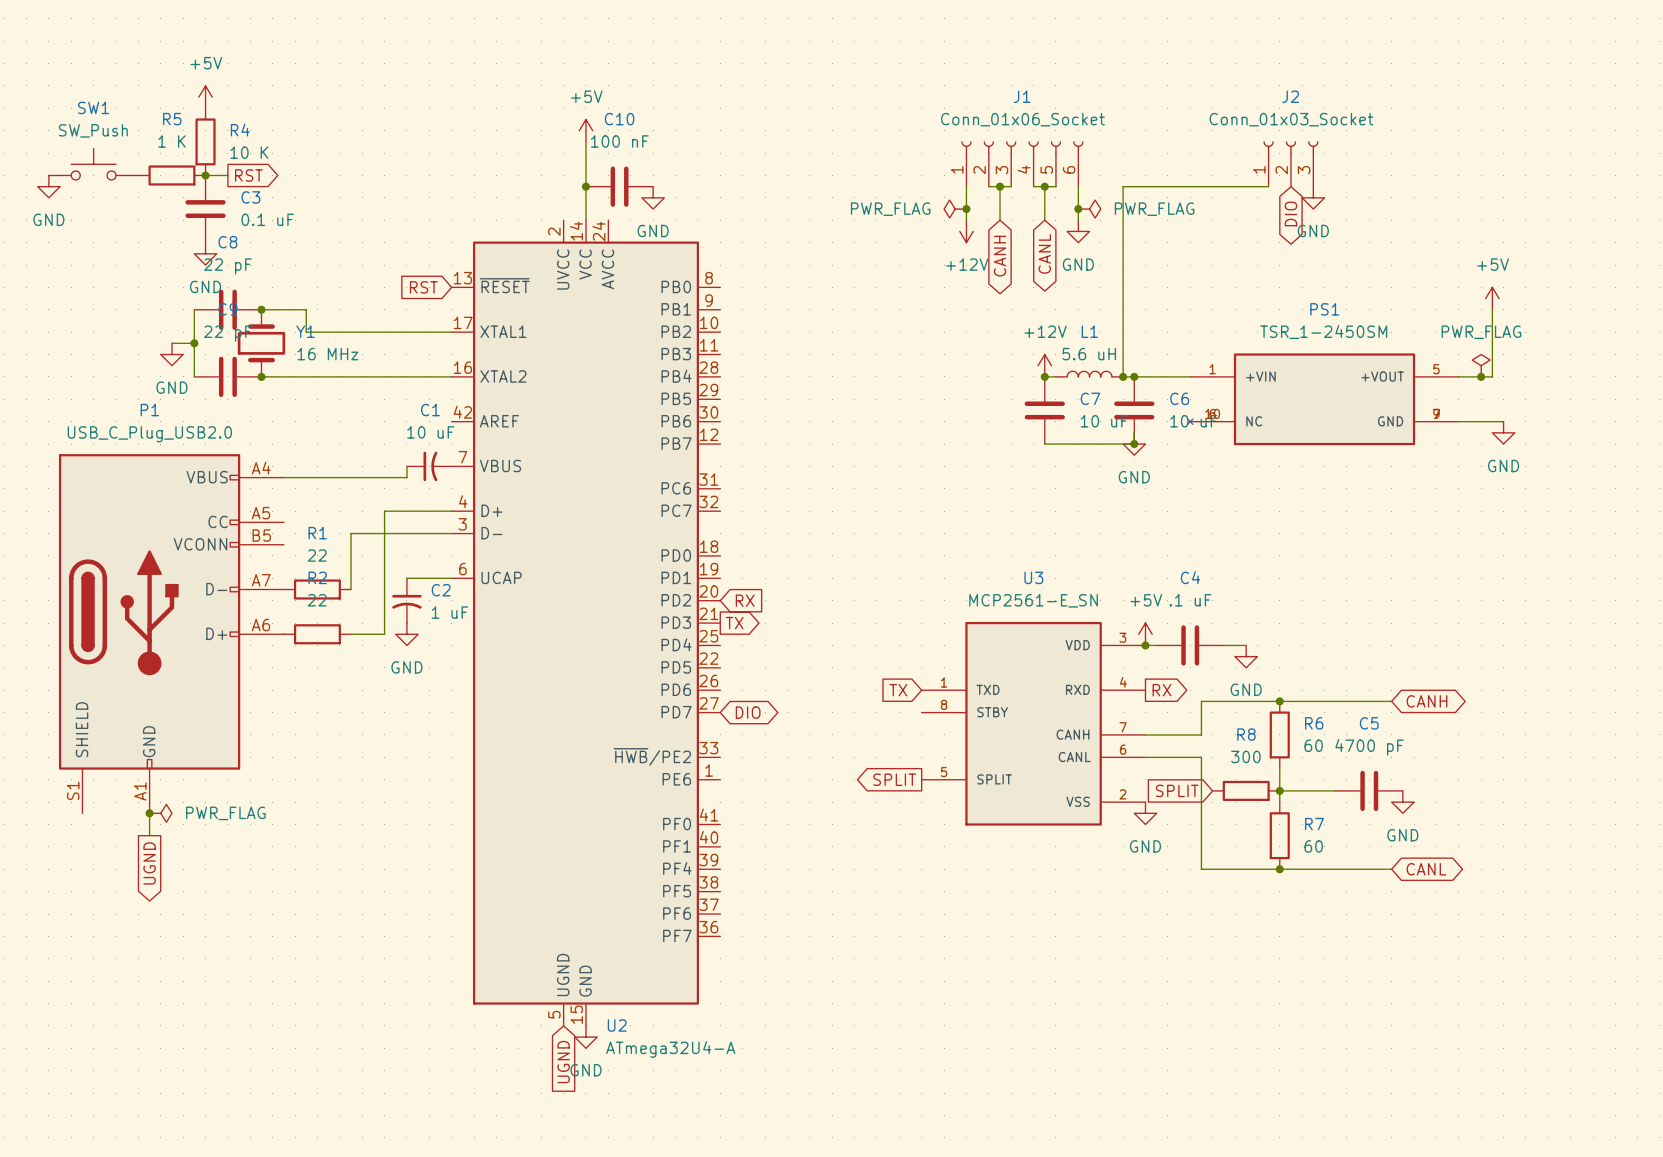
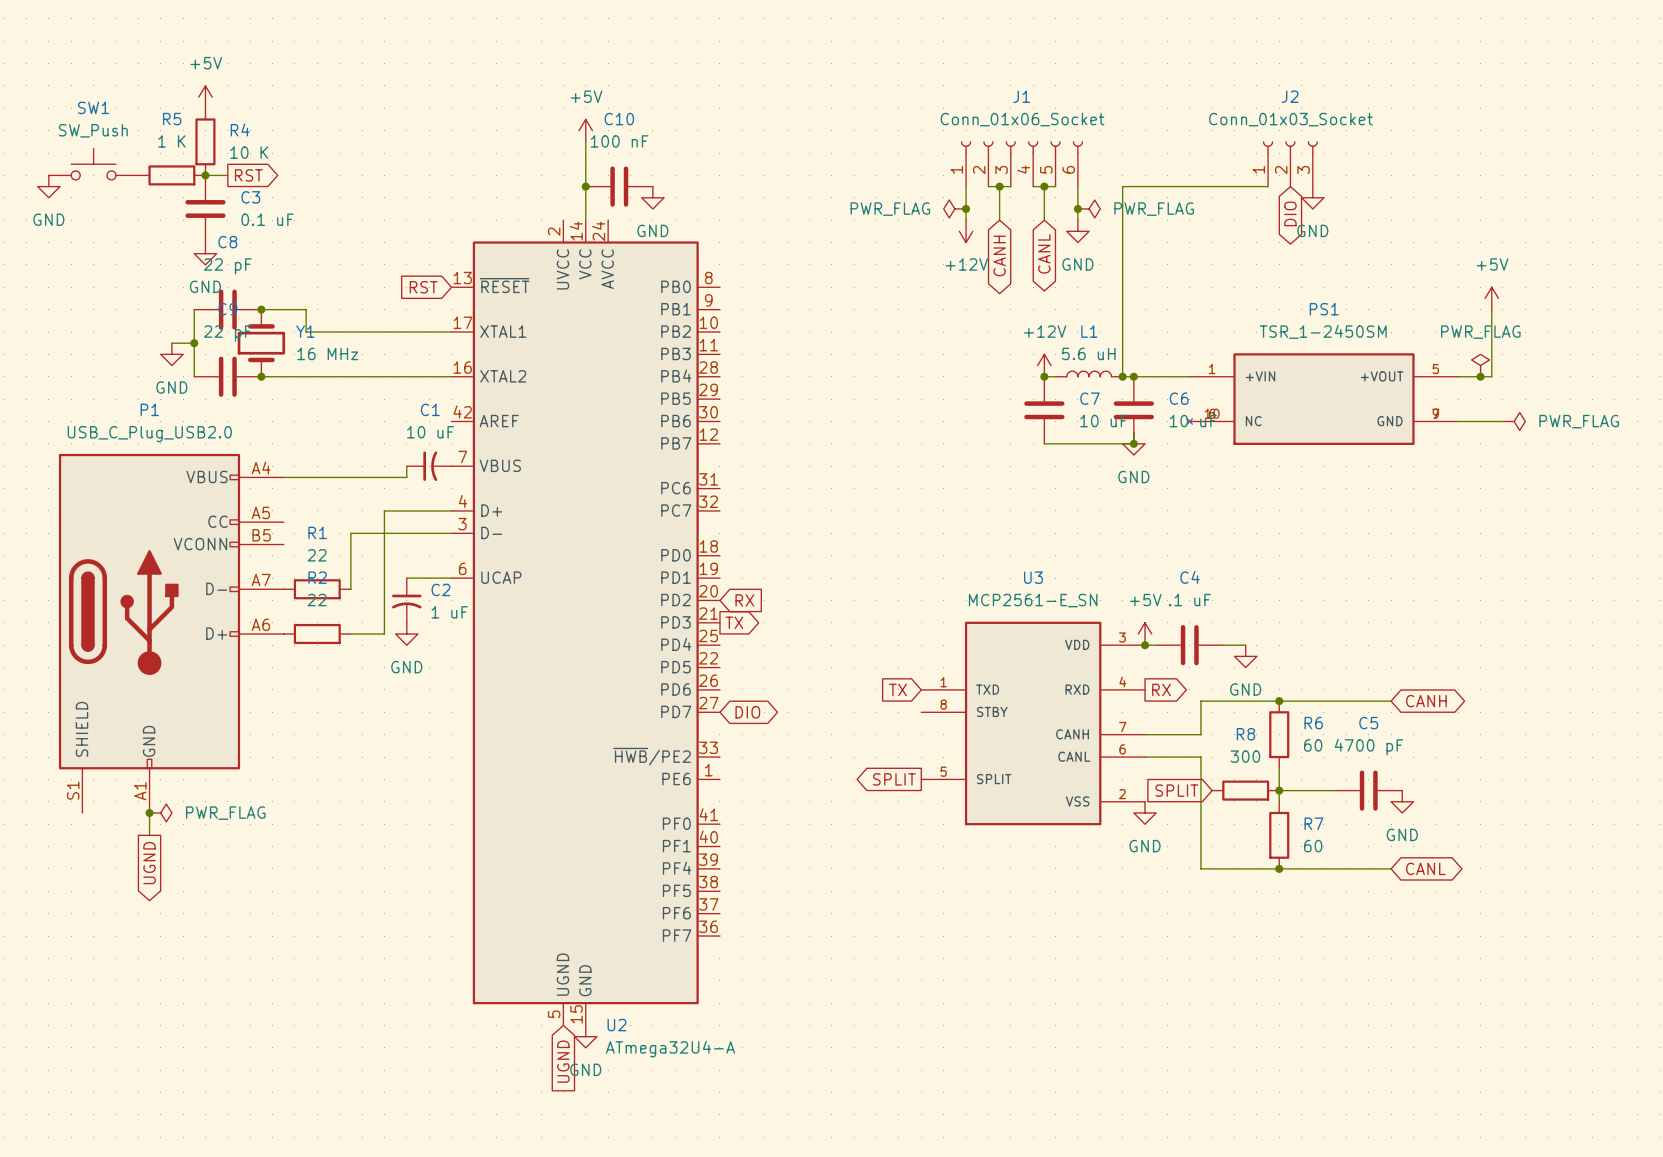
power symbol: none -> PWR_FLAG (1514, 421)
power symbol: GND (1503, 432) -> none

